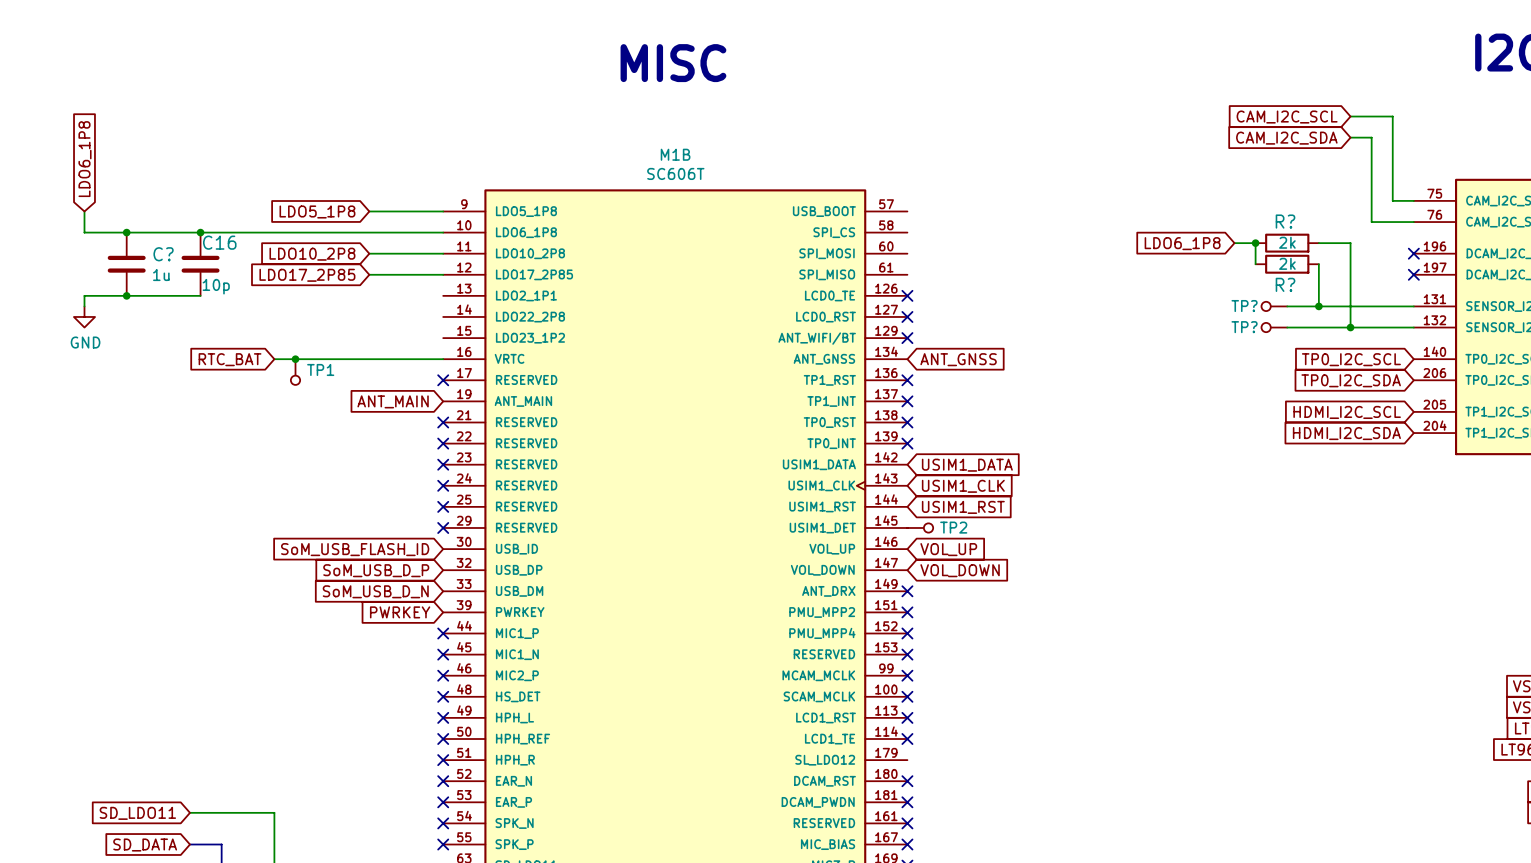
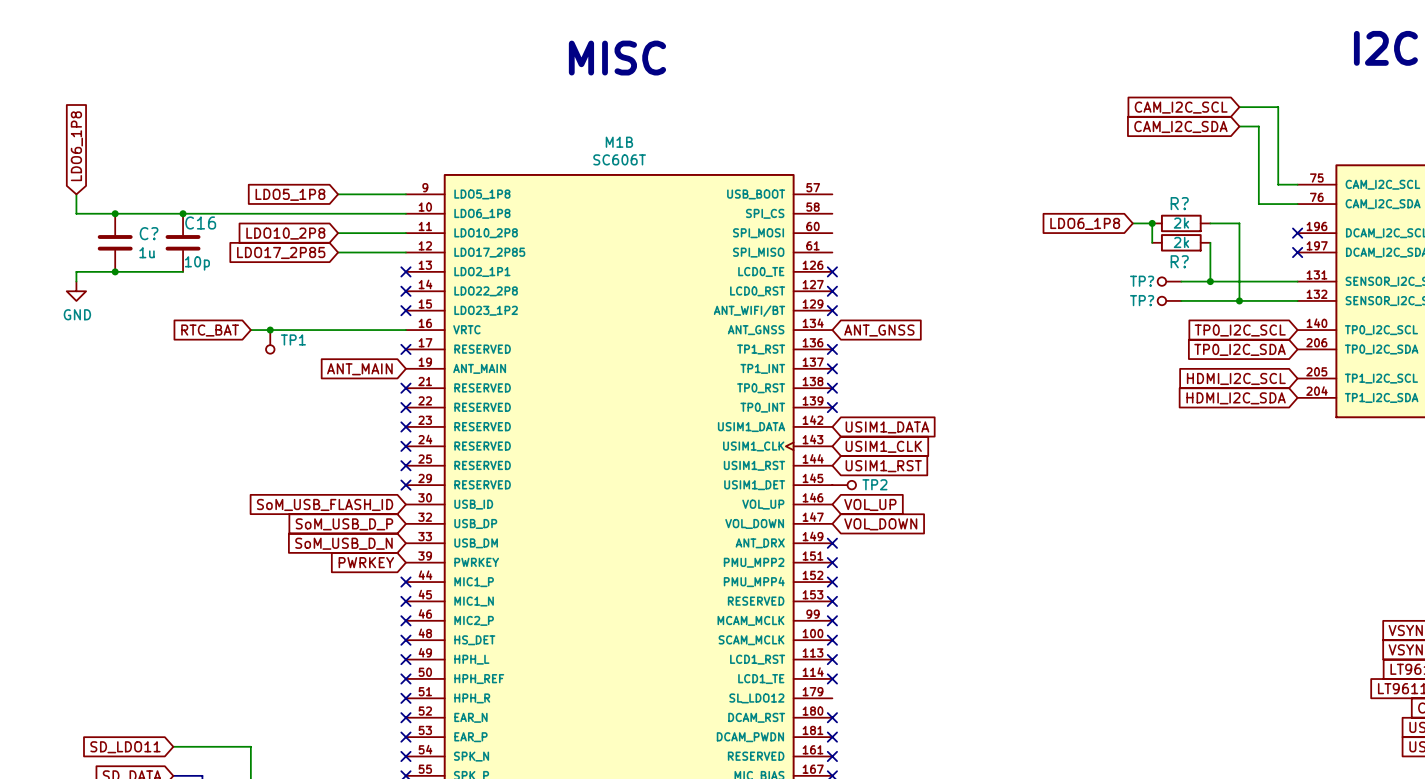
no-connect mark: none -> (405, 271)
no-connect mark: none -> (405, 291)
no-connect mark: none -> (405, 310)

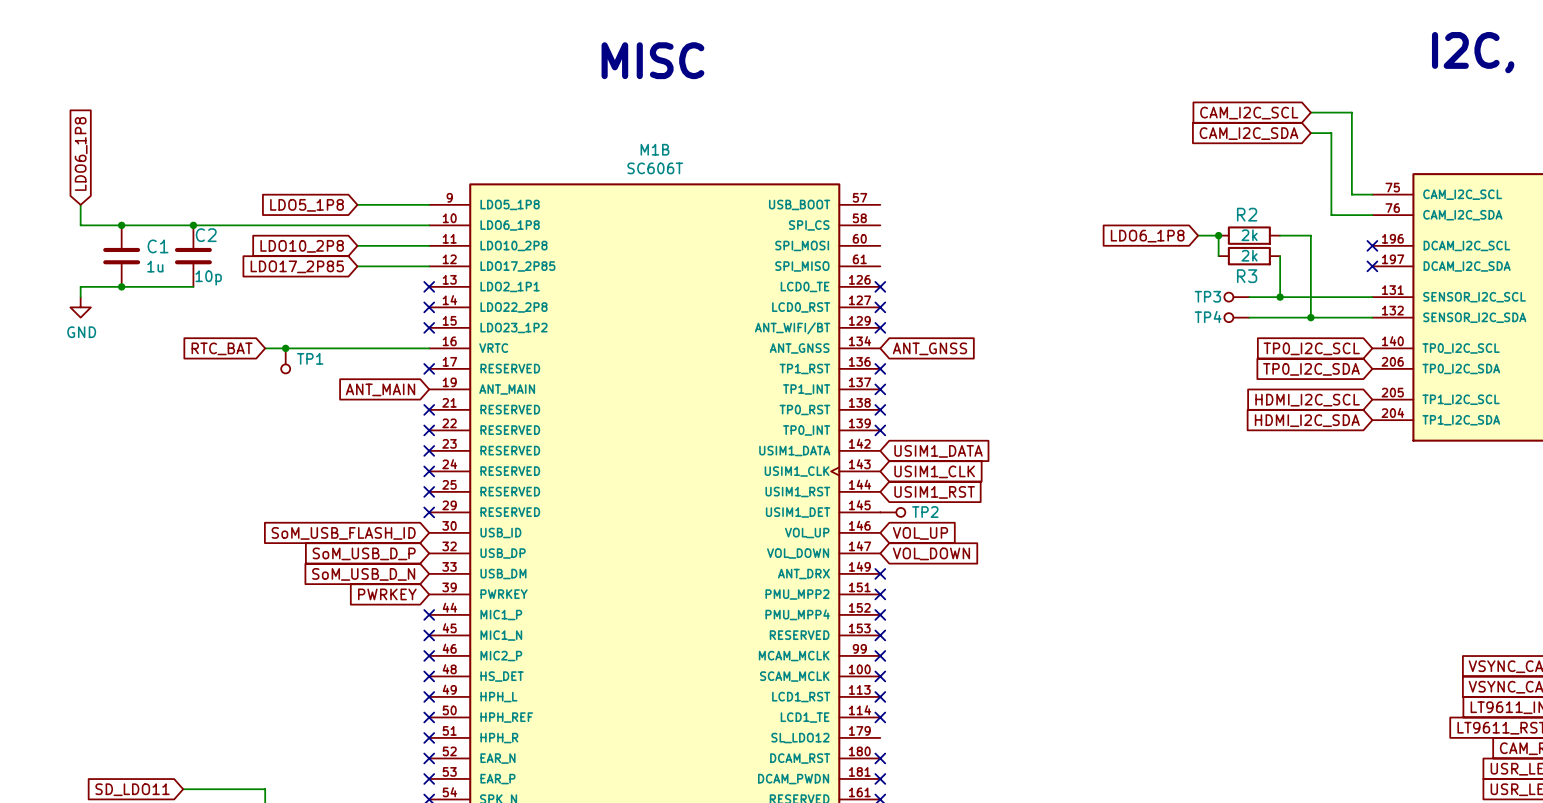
R? name: R? (1179, 203) -> R2 (1247, 214)
C16 name: C16 (200, 222) -> C2 (206, 235)
C? name: C? (149, 233) -> C1 (158, 246)
R? name: R? (1179, 261) -> R3 (1247, 276)
TP? name: TP? (1142, 281) -> TP3 (1207, 296)
TP? name: TP? (1142, 300) -> TP4 (1208, 317)

